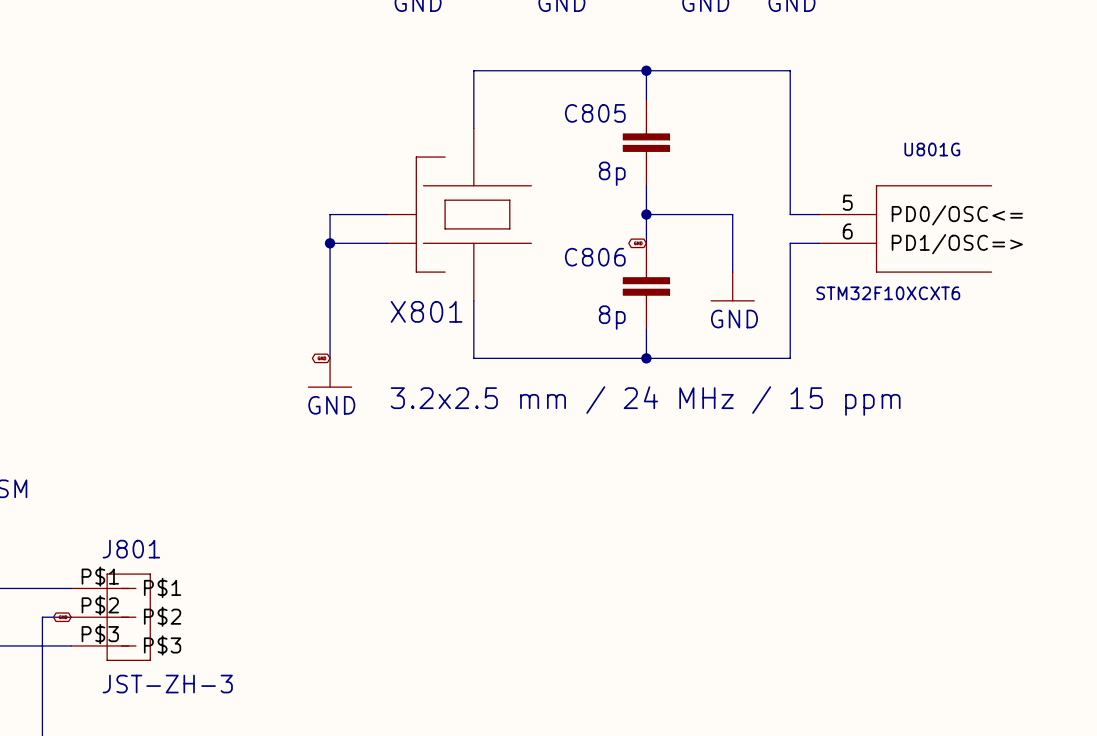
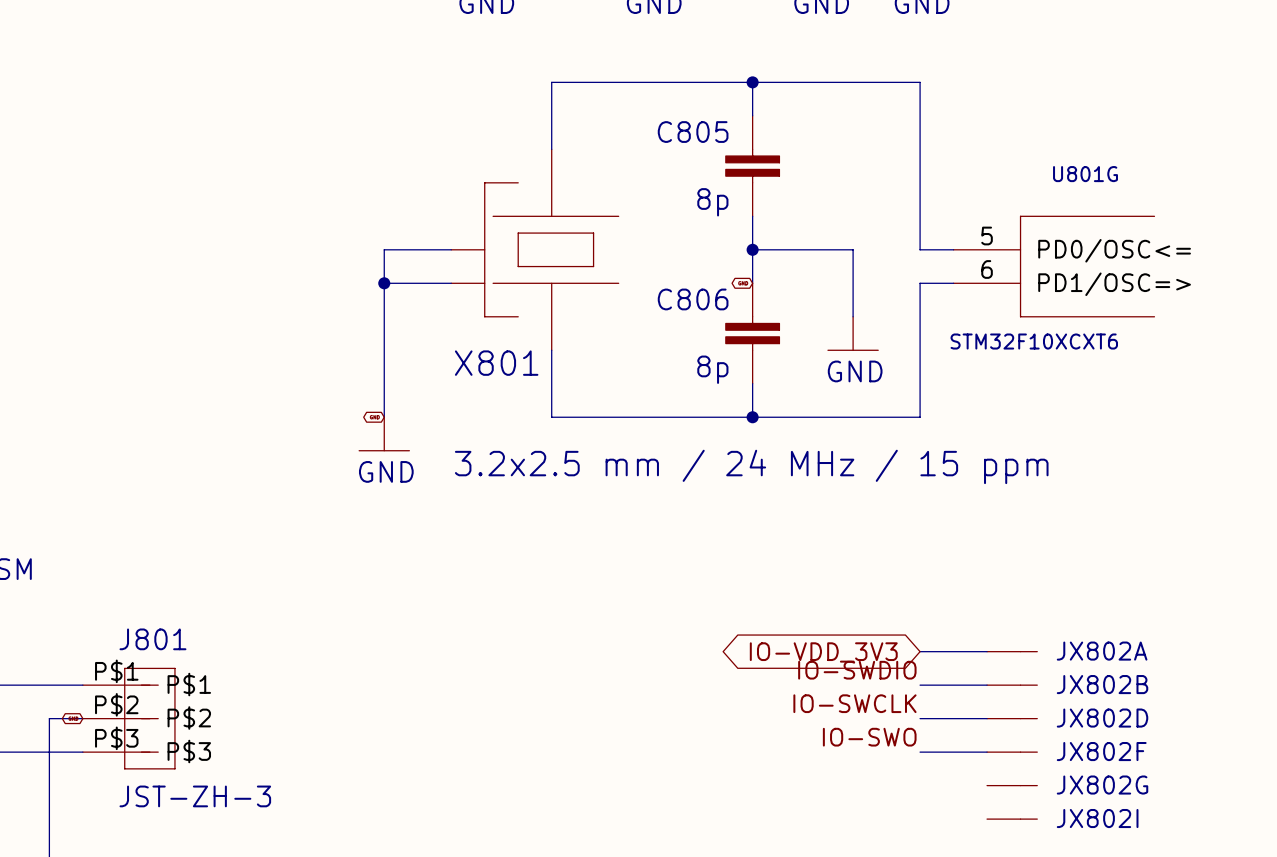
wire: none -> (920, 651) (987, 651)
JX802A: none -> (1012, 651)
global label: none -> IO-VDD_3V3 (823, 652)
label: none -> IO-SWDIO (857, 670)
wire: none -> (920, 685) (987, 685)
JX802B: none -> (1012, 685)
label: none -> IO-SWCLK (854, 703)
wire: none -> (920, 718) (987, 718)
JX802D: none -> (1012, 718)
label: none -> IO-SWO (869, 737)
wire: none -> (920, 752) (987, 752)
JX802F: none -> (1012, 752)
JX802G: none -> (1012, 785)
JX802I: none -> (1012, 819)

